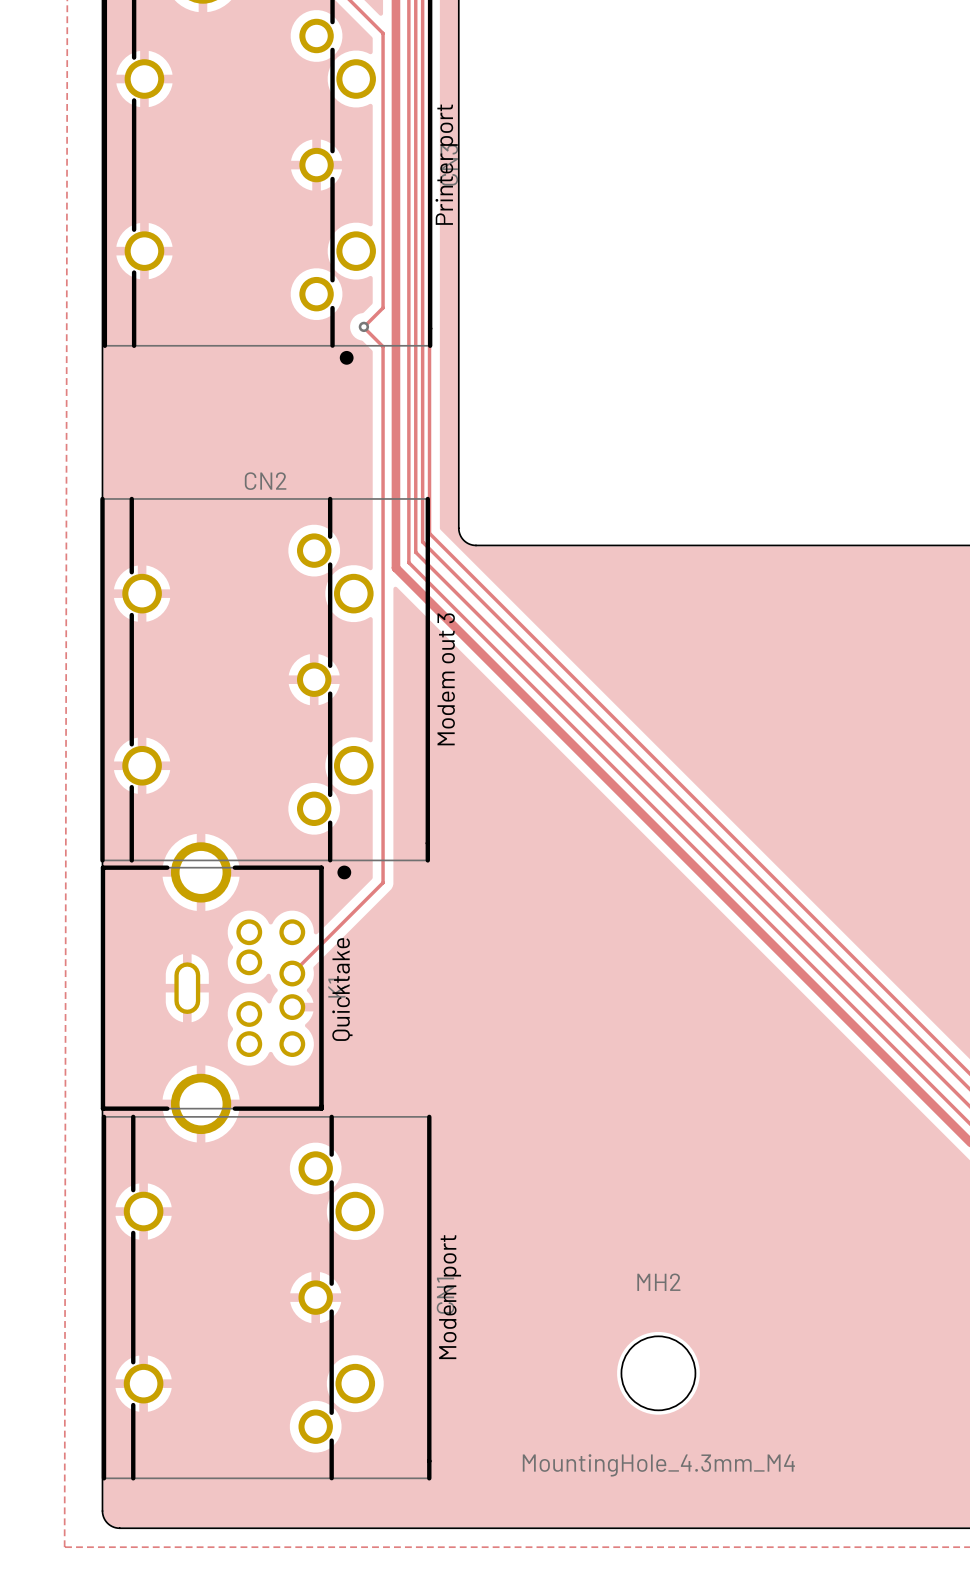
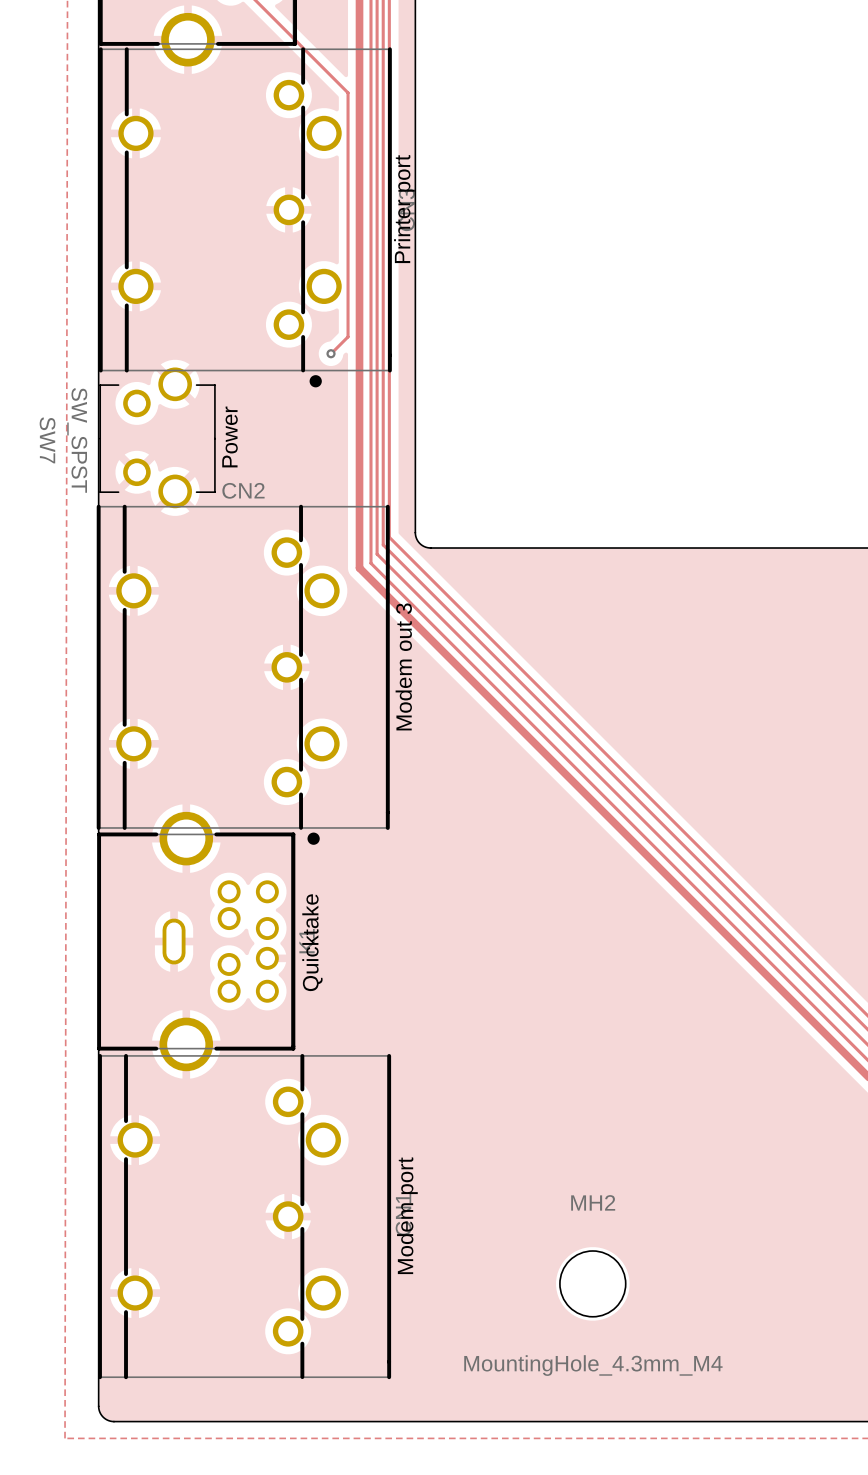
track: (363, 326) (383, 346) (383, 882) (292, 973) -> none
SW7: none -> SW_SPST (157, 437)
text: none -> Power (230, 436)

